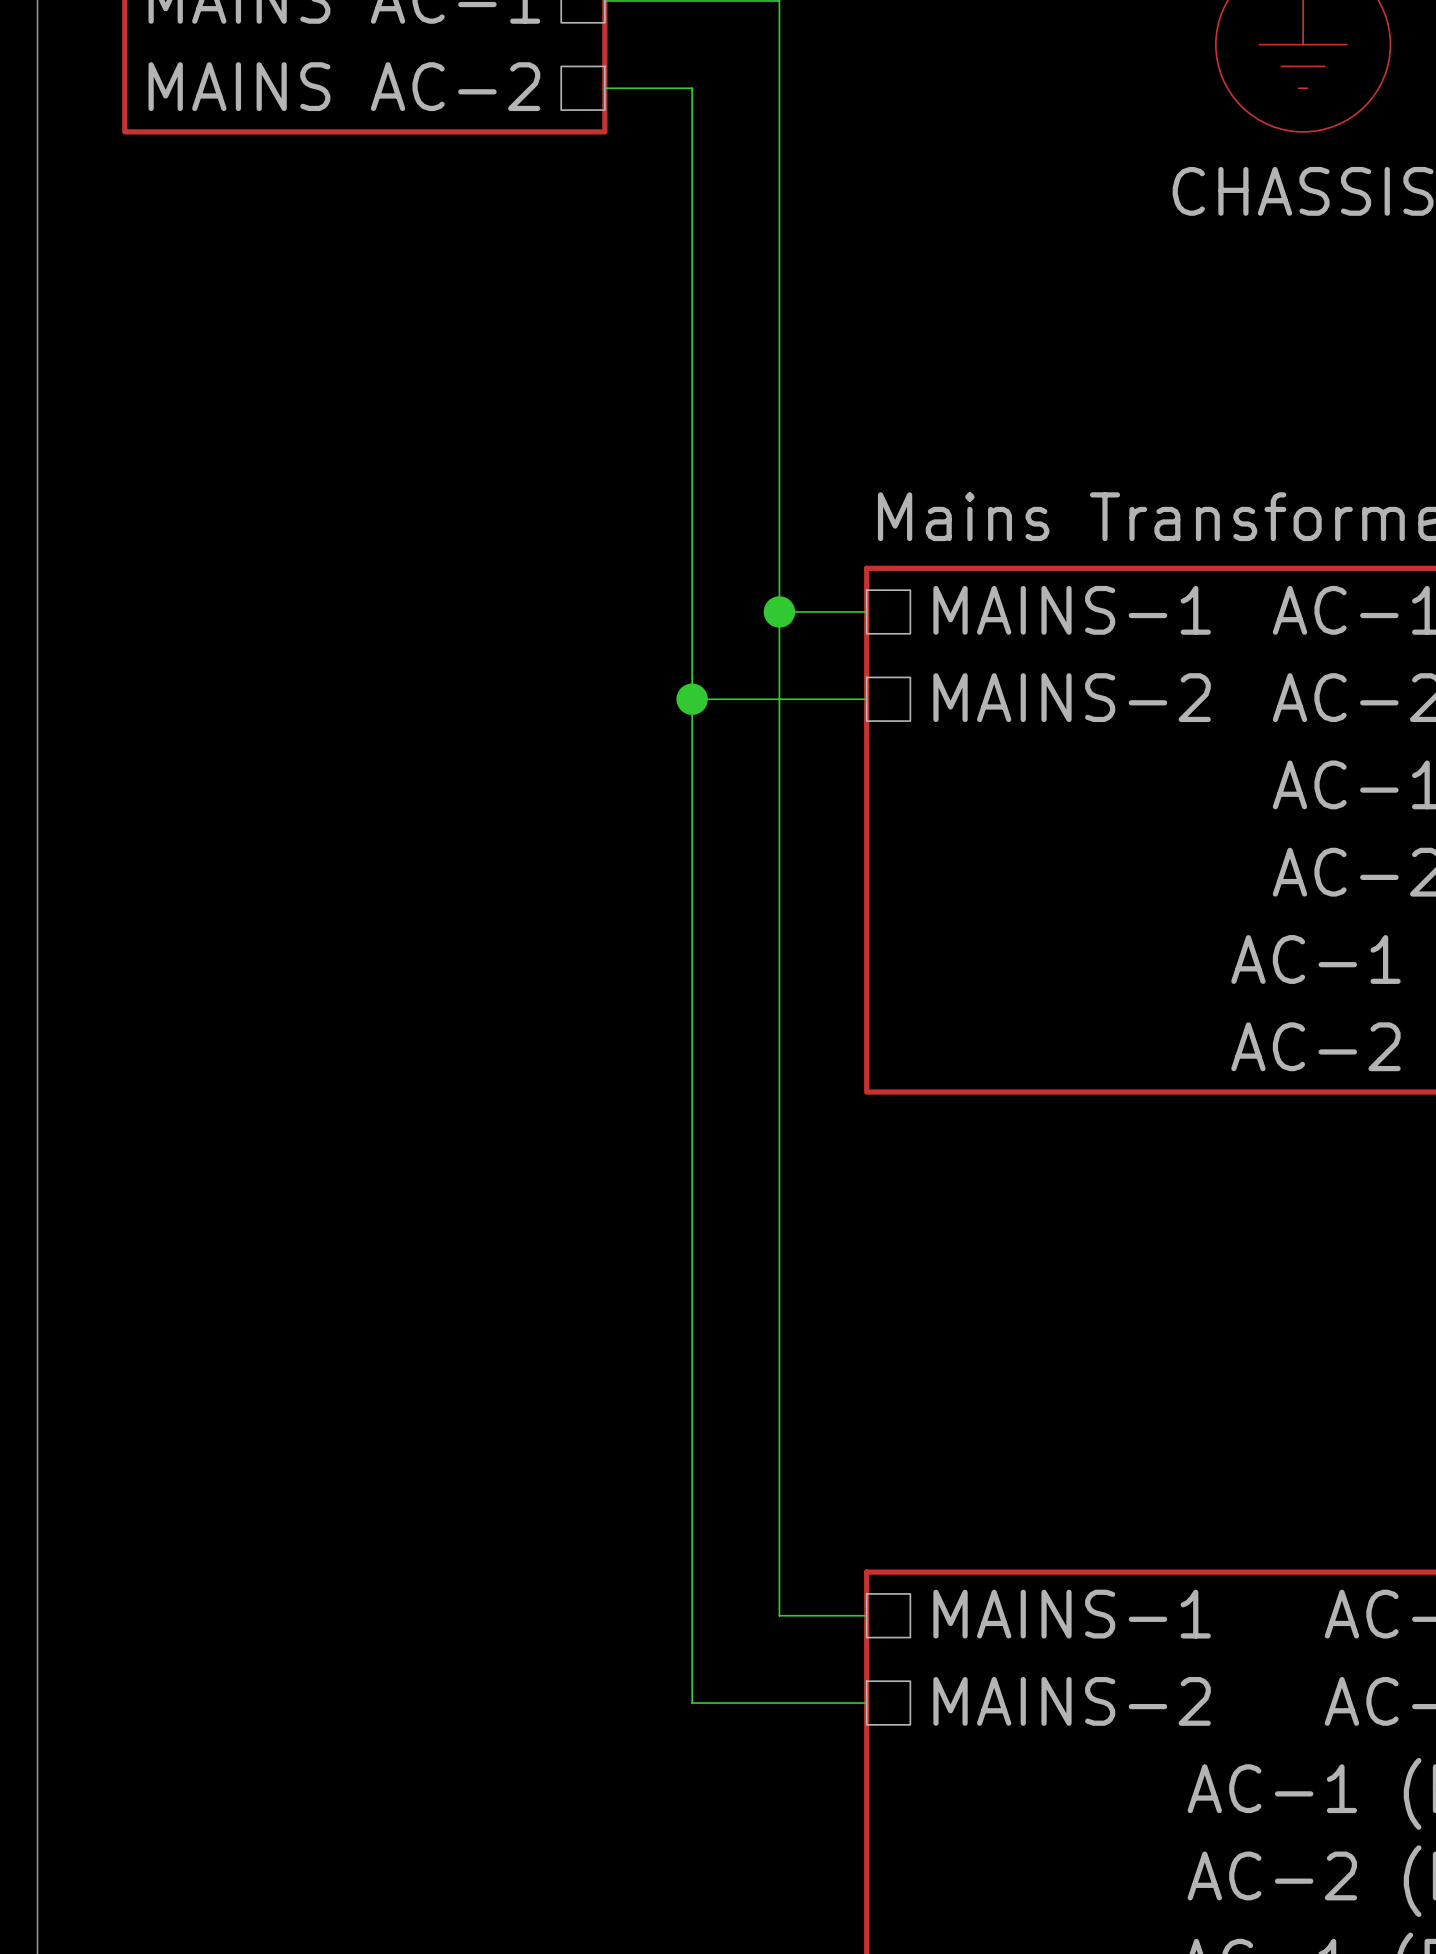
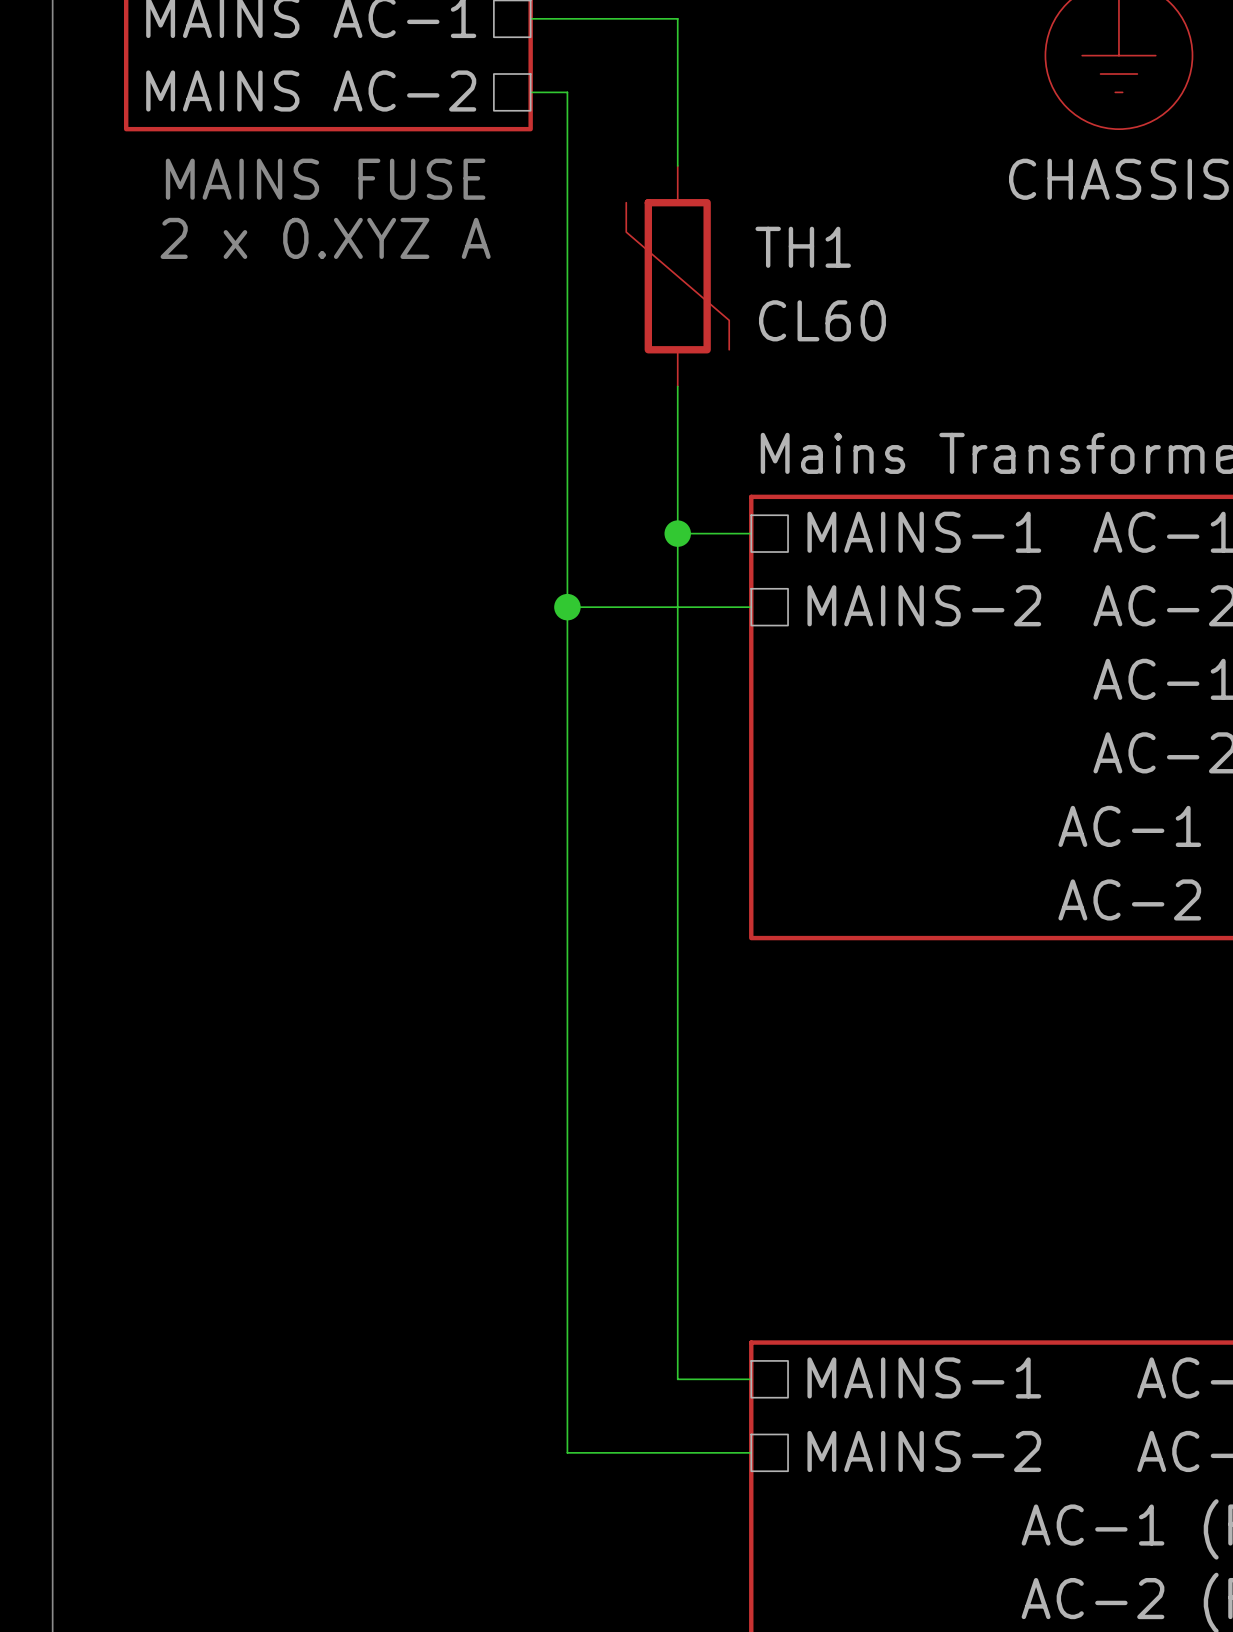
wire: (648, 88) (692, 88) (692, 1703) -> (567, 92) (567, 1452) (604, 1452)
wire: (779, 175) (779, 437) -> none
text: none -> MAINS FUSE (325, 179)
text: none -> 2 x 0.XYZ A (325, 238)
TH1: none -> CL60 (677, 276)
wire: none -> (567, 607) (604, 607)
junction position: (692, 699) -> (567, 607)

